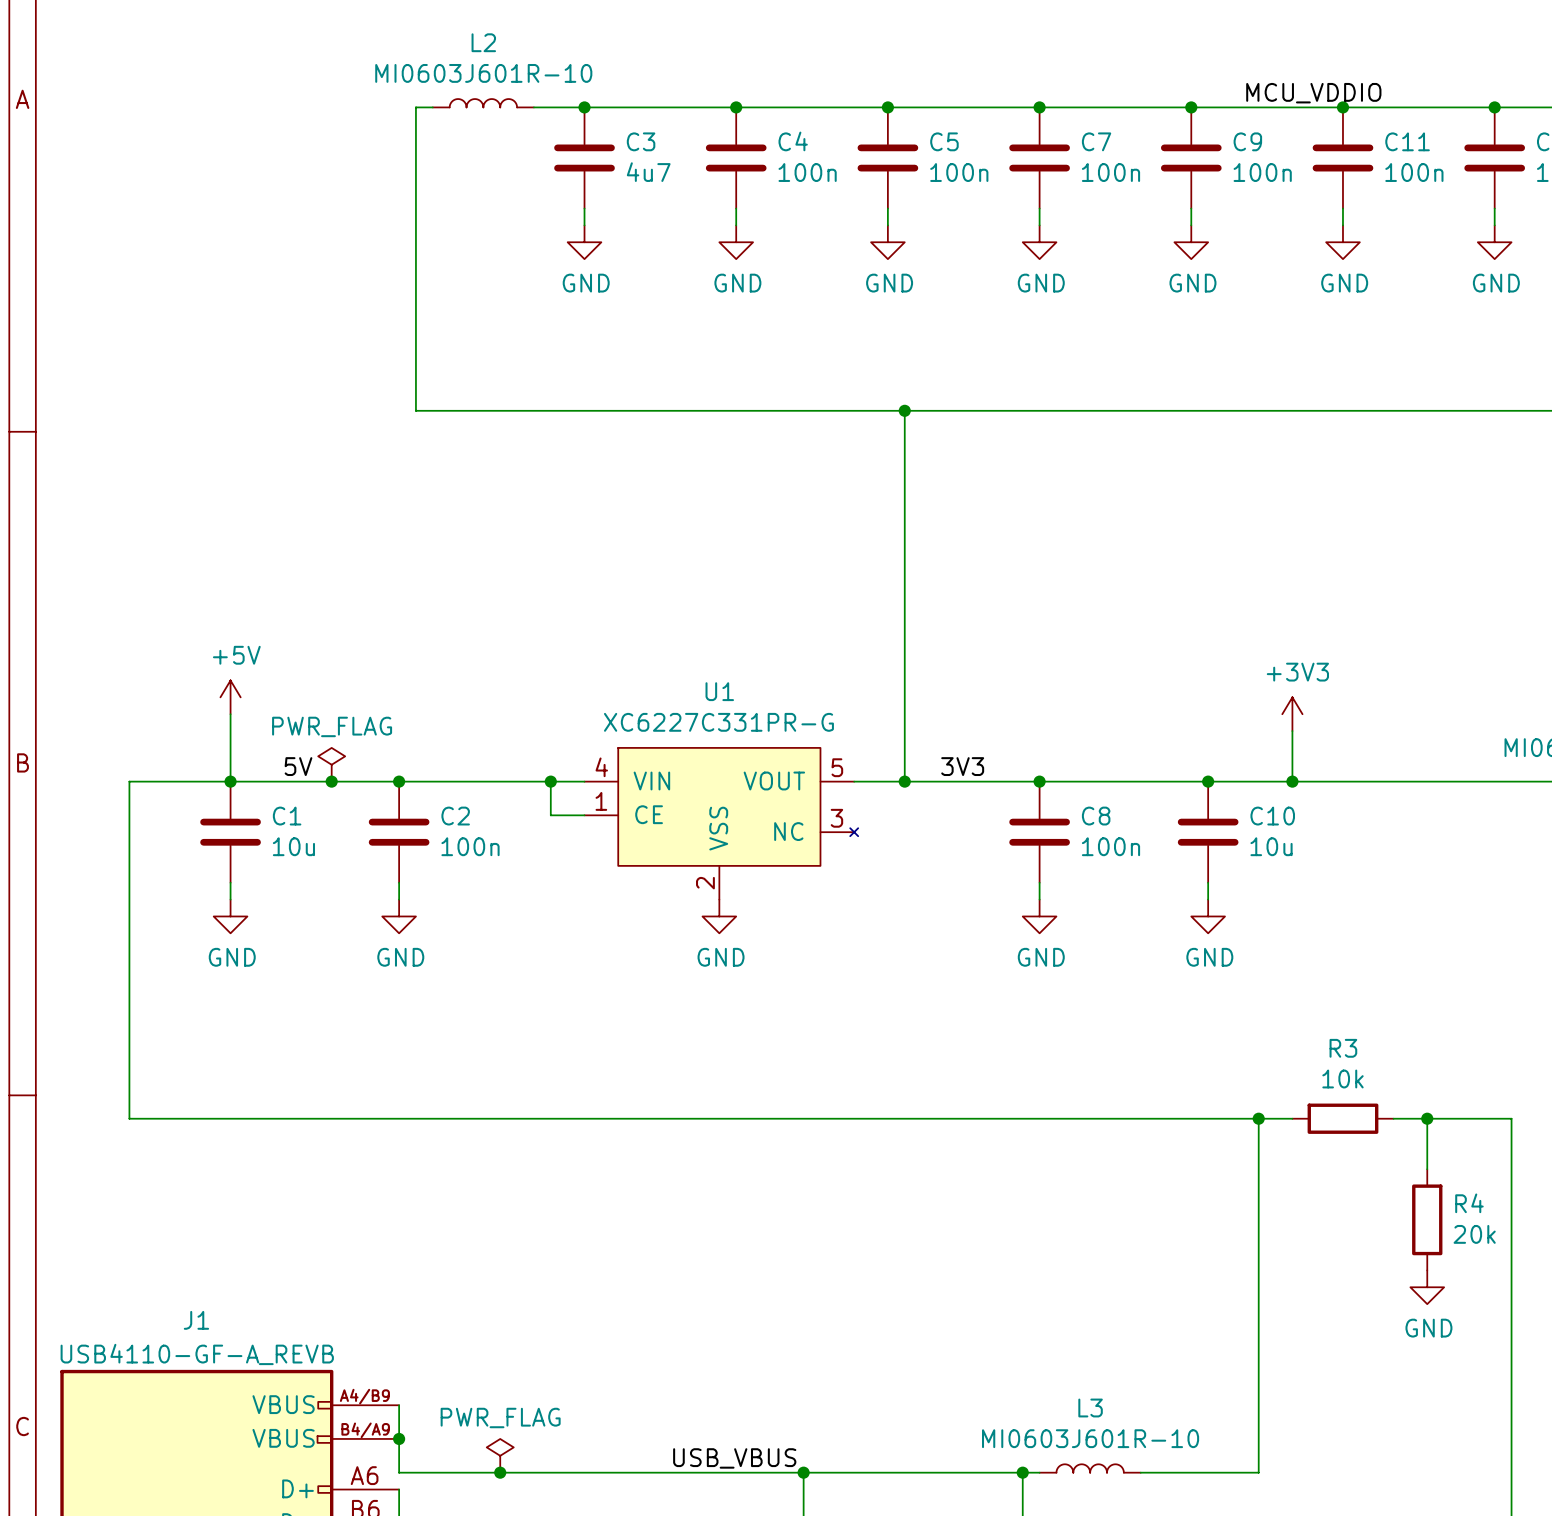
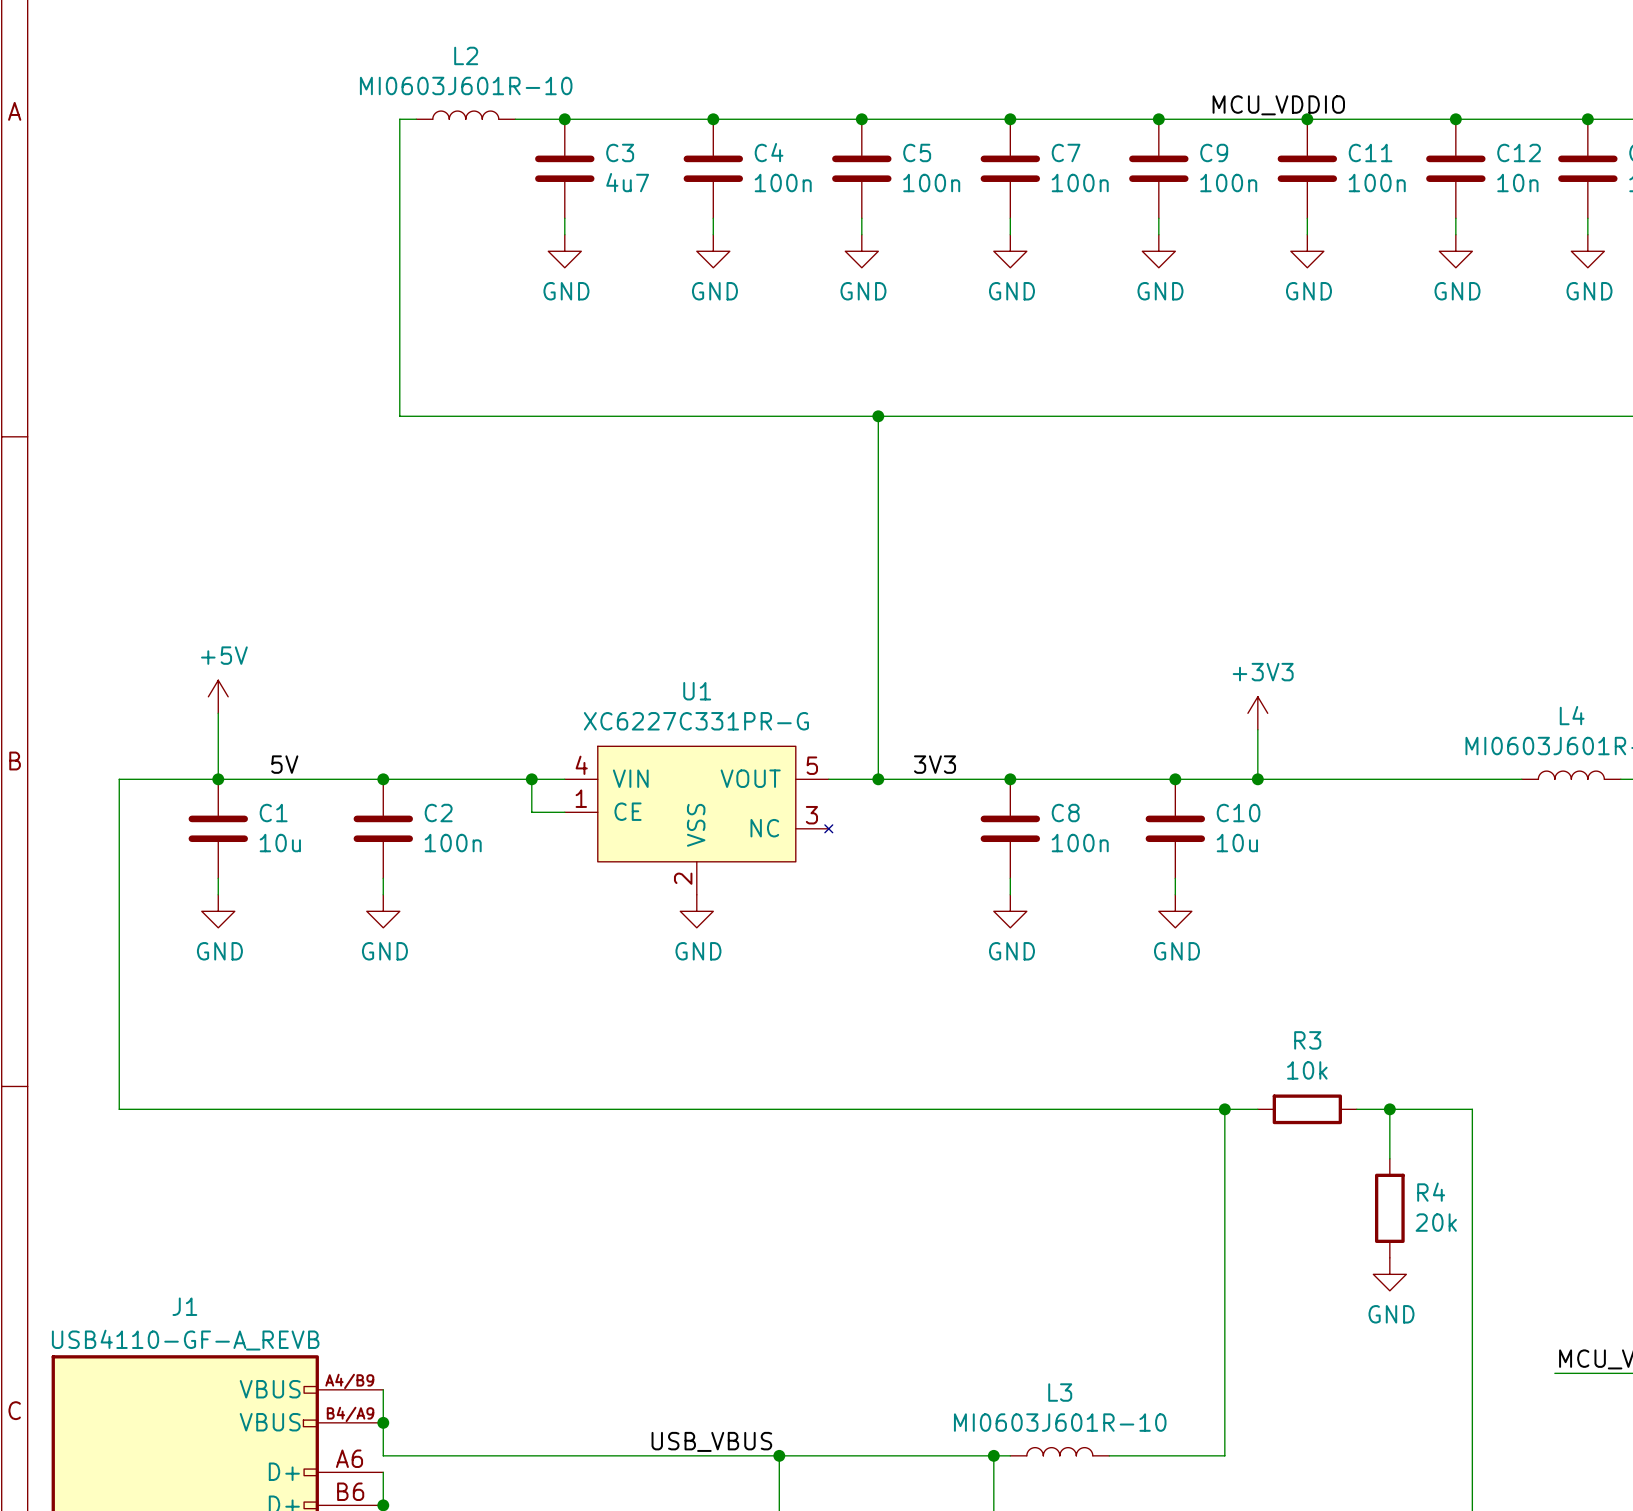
power symbol: PWR_FLAG (331, 764) -> none
junction: (331, 781) -> none
power symbol: PWR_FLAG (500, 1455) -> none
junction: (500, 1472) -> none

